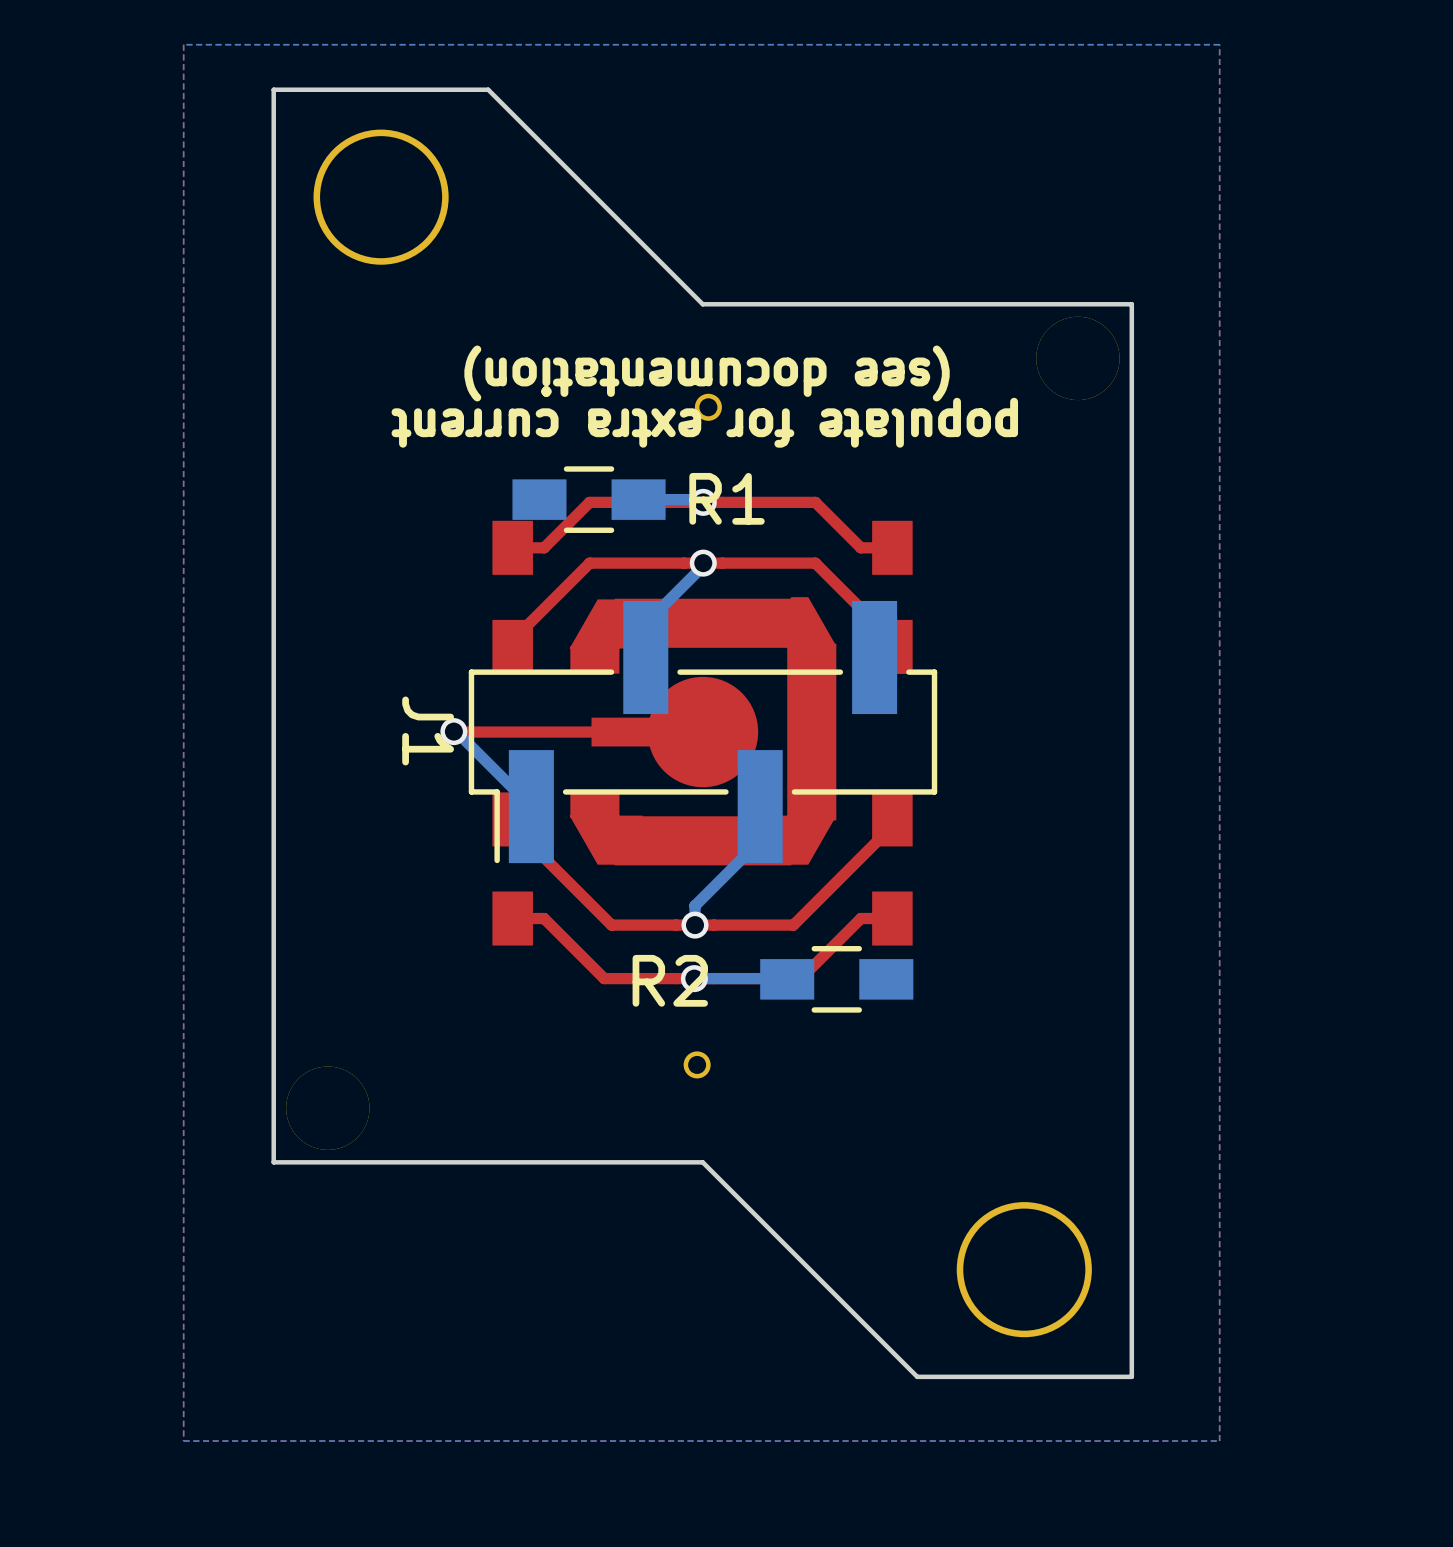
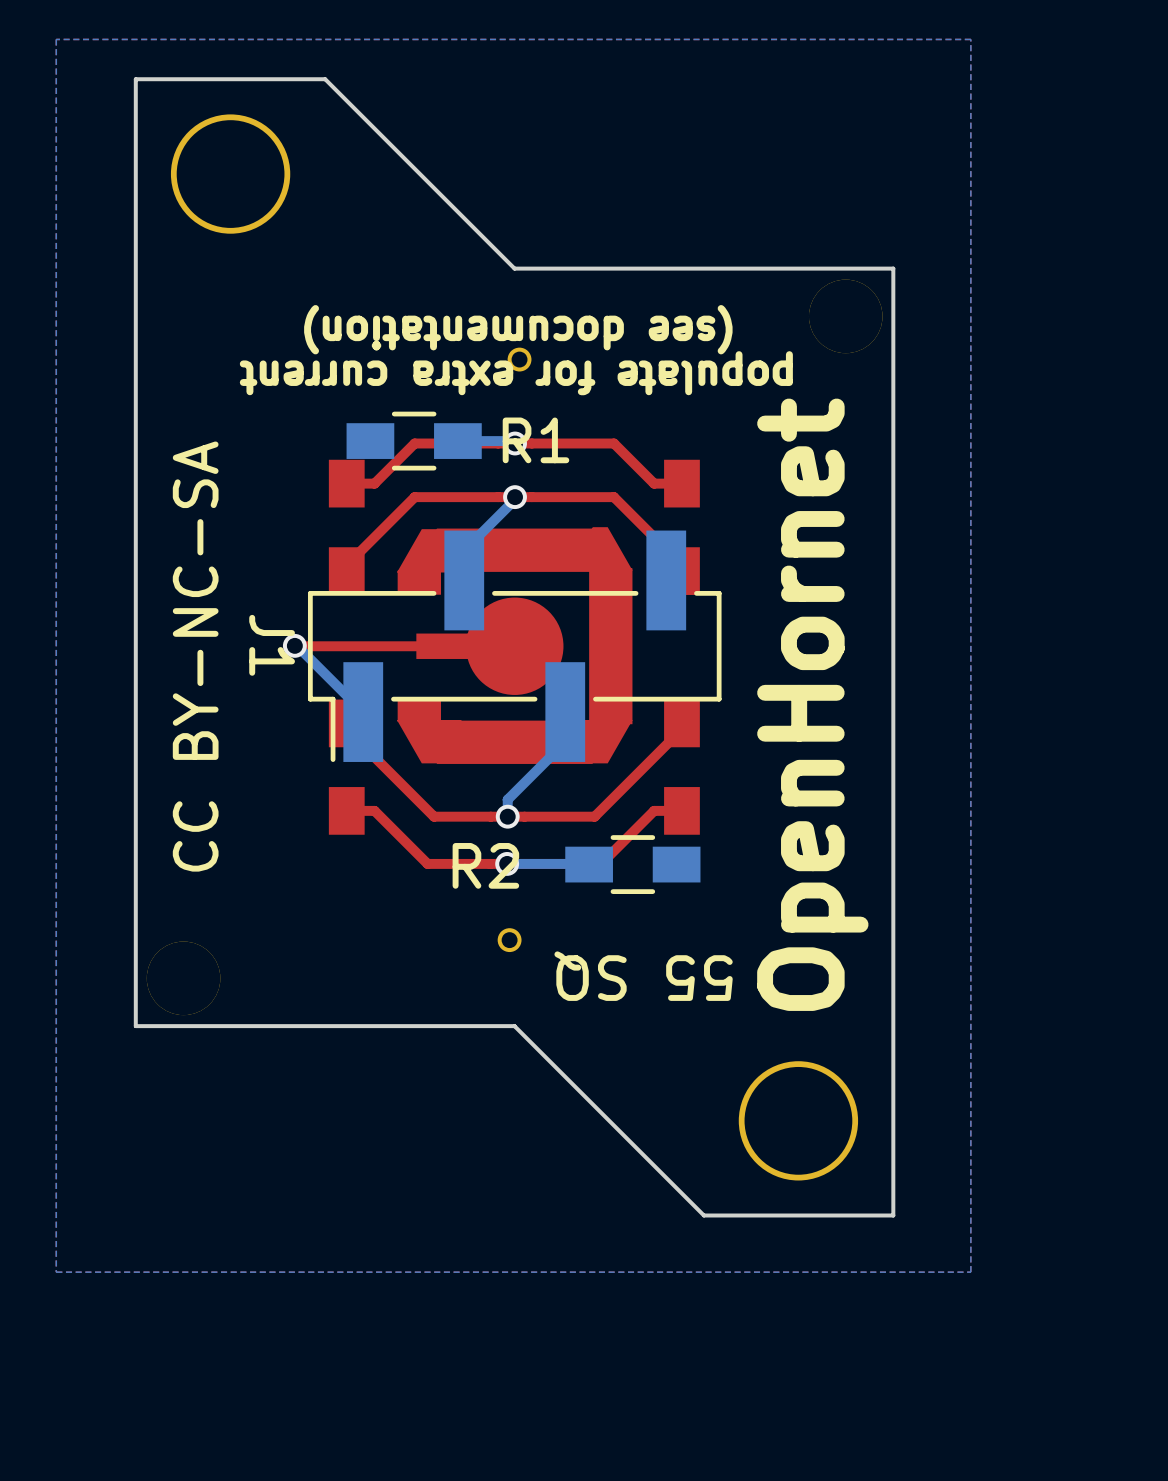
text: none -> CC BY-NC-SA (195, 656)
text: none -> OpenHornet (812, 704)
text: none -> 55 SQ (643, 976)

